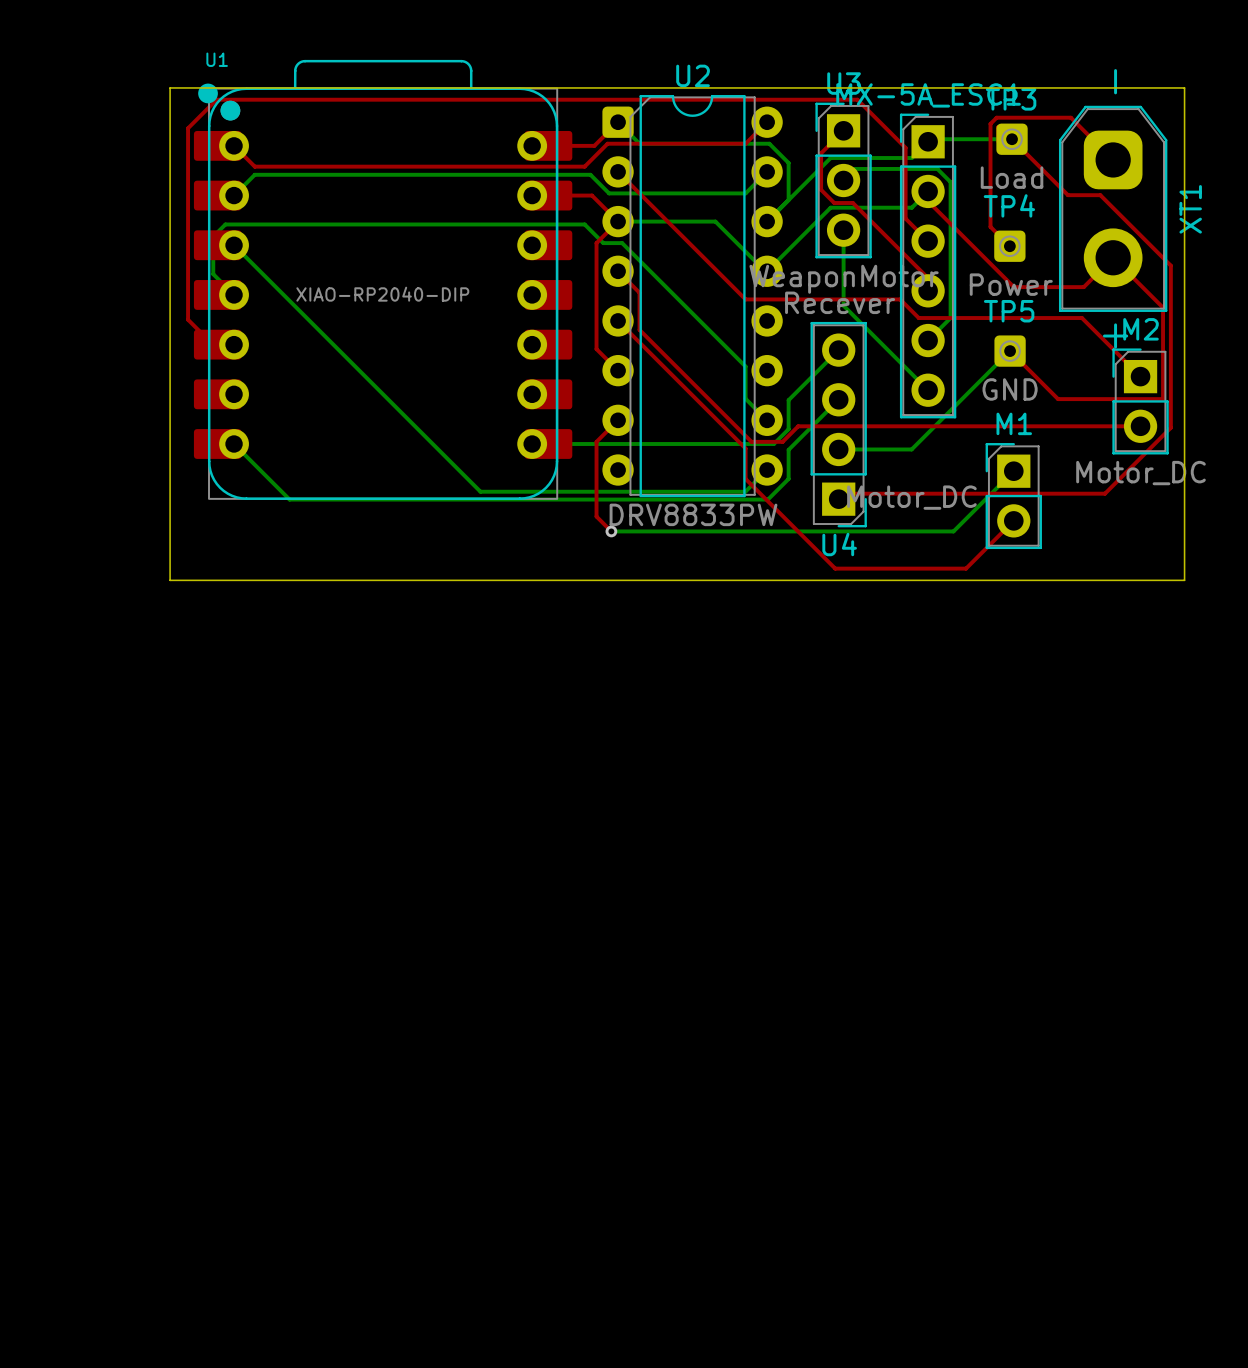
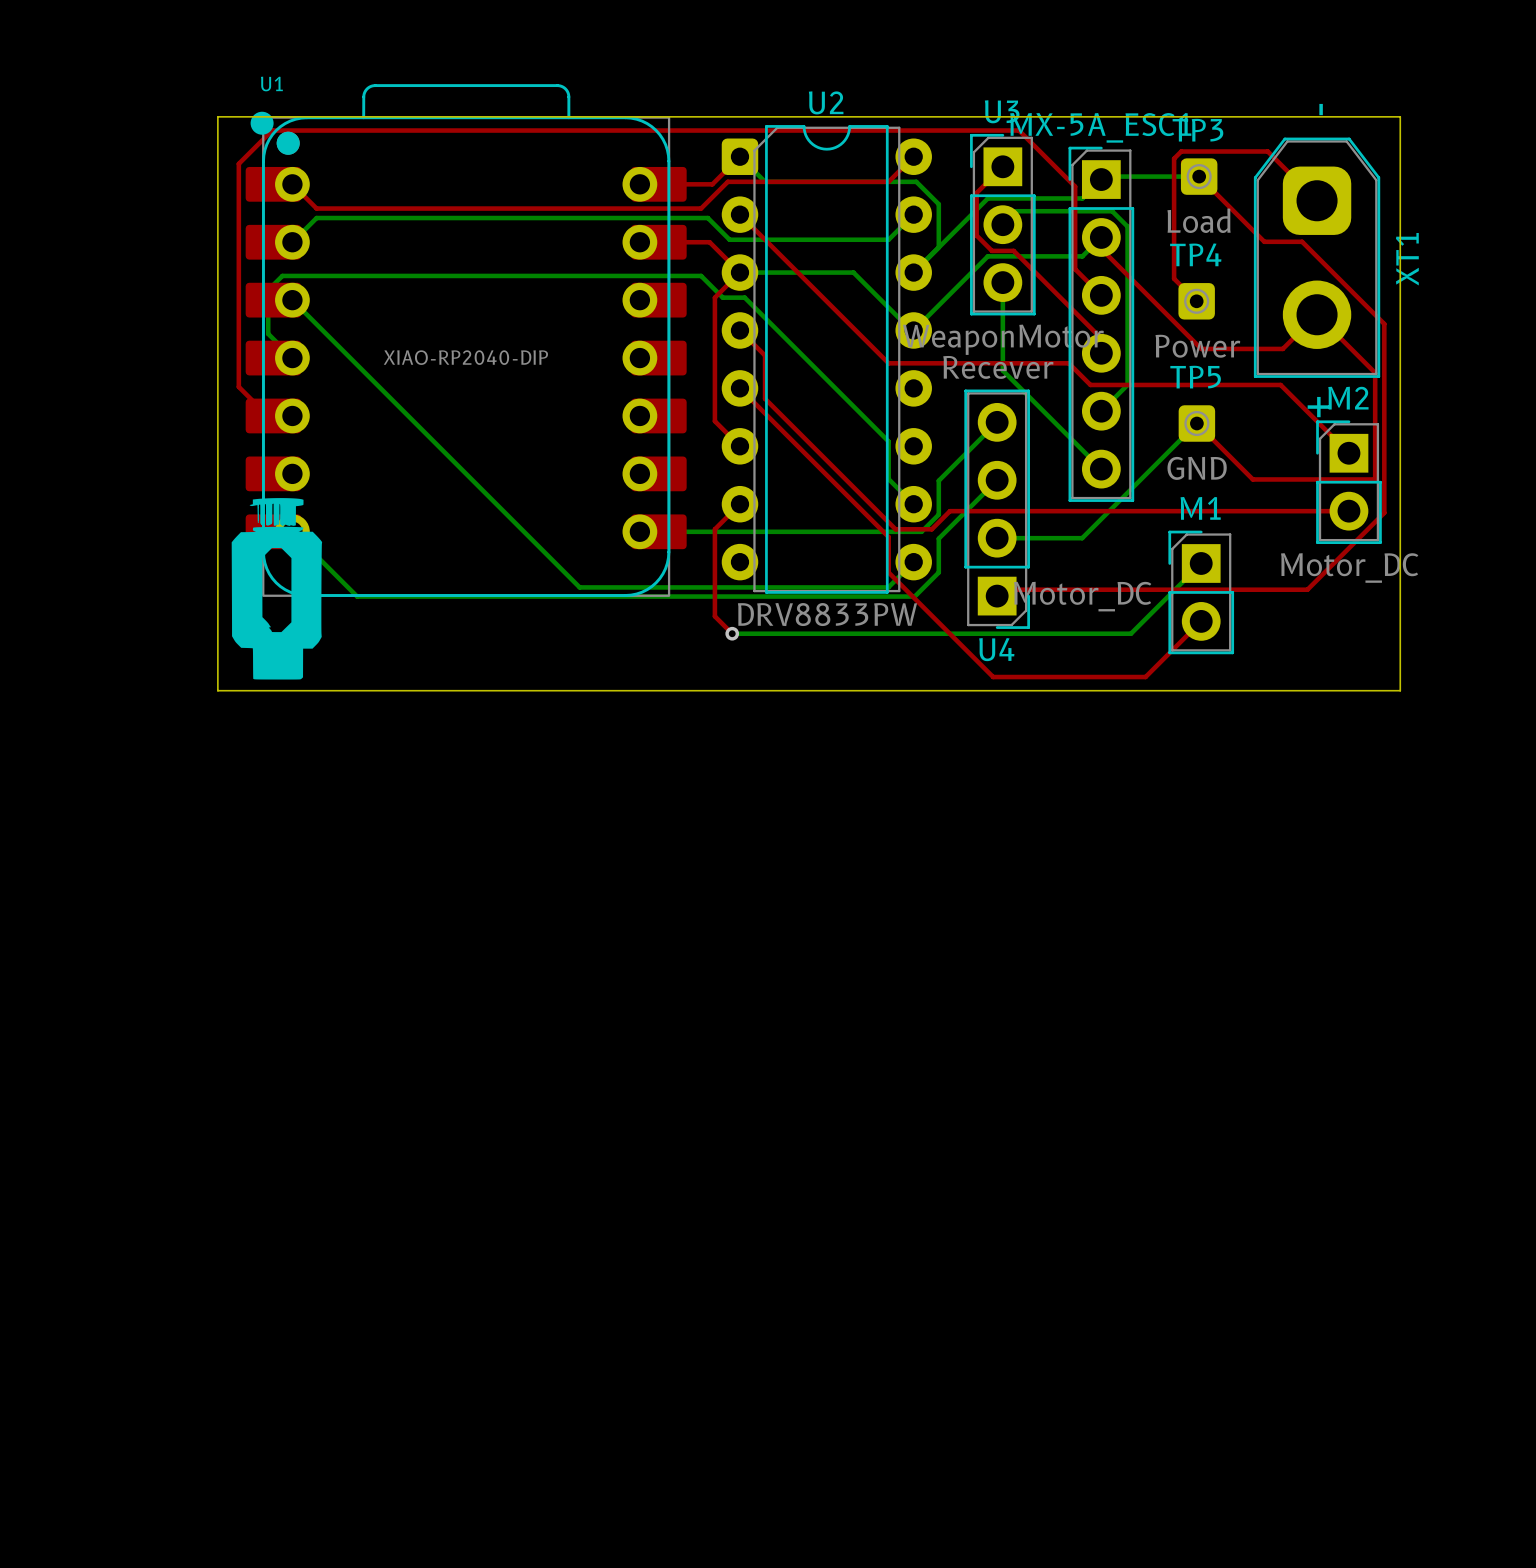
drawing: none -> [231, 498, 323, 680]

